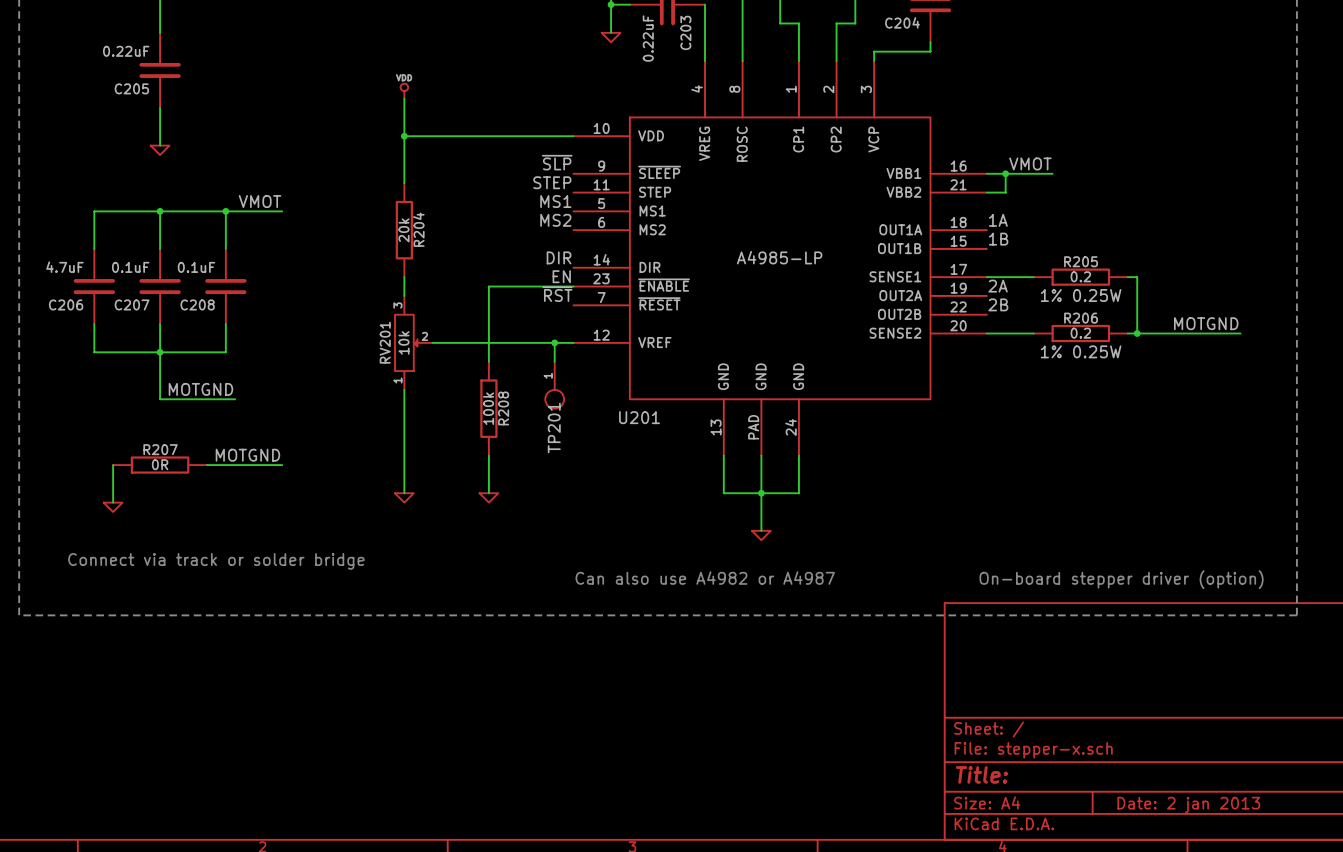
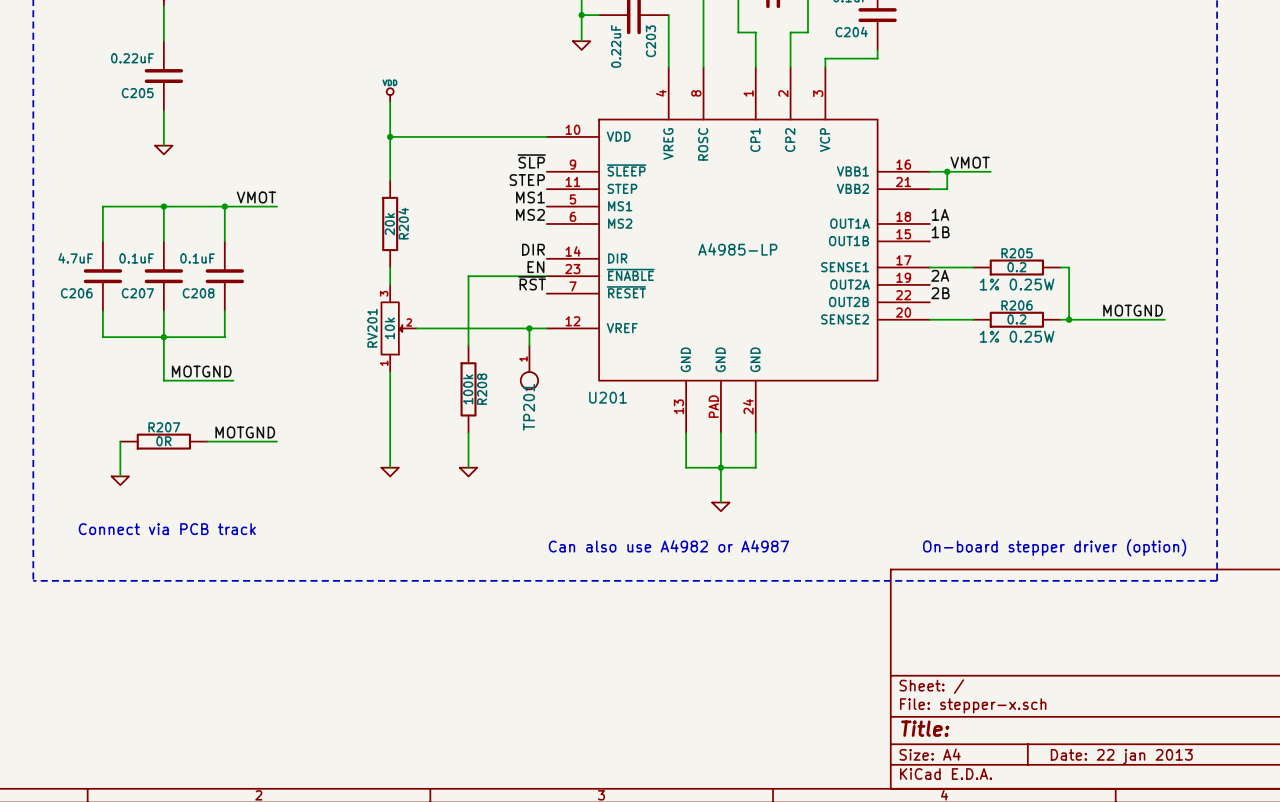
text: Connect via track or solder bridge (216, 561) -> Connect via PCB track (167, 529)
title block: Date: 2 jan 2013 (1188, 805) -> Date: 22 jan 2013 (1121, 756)

